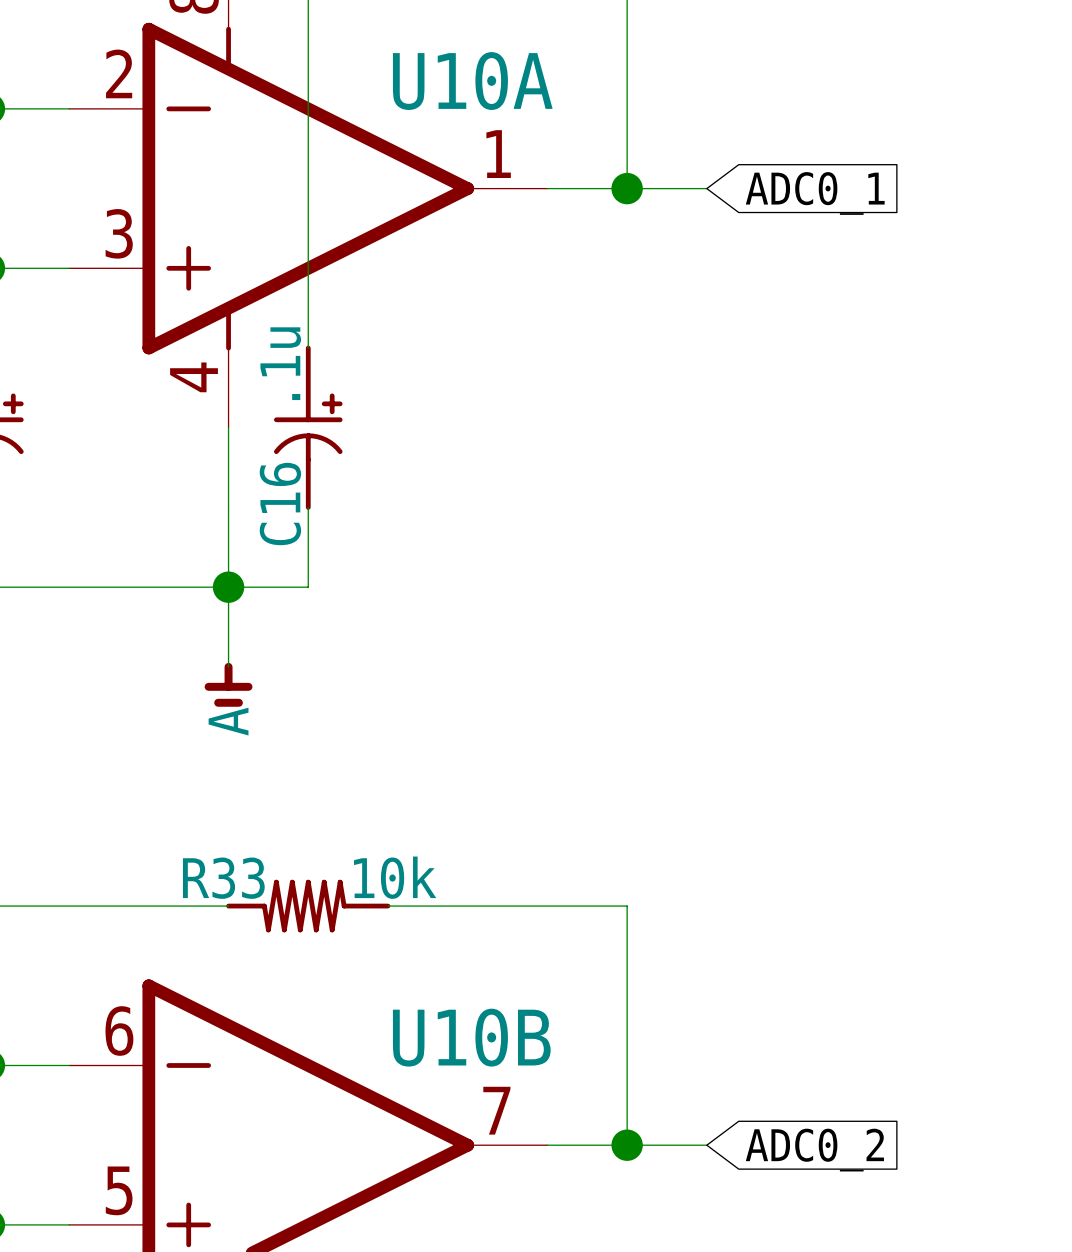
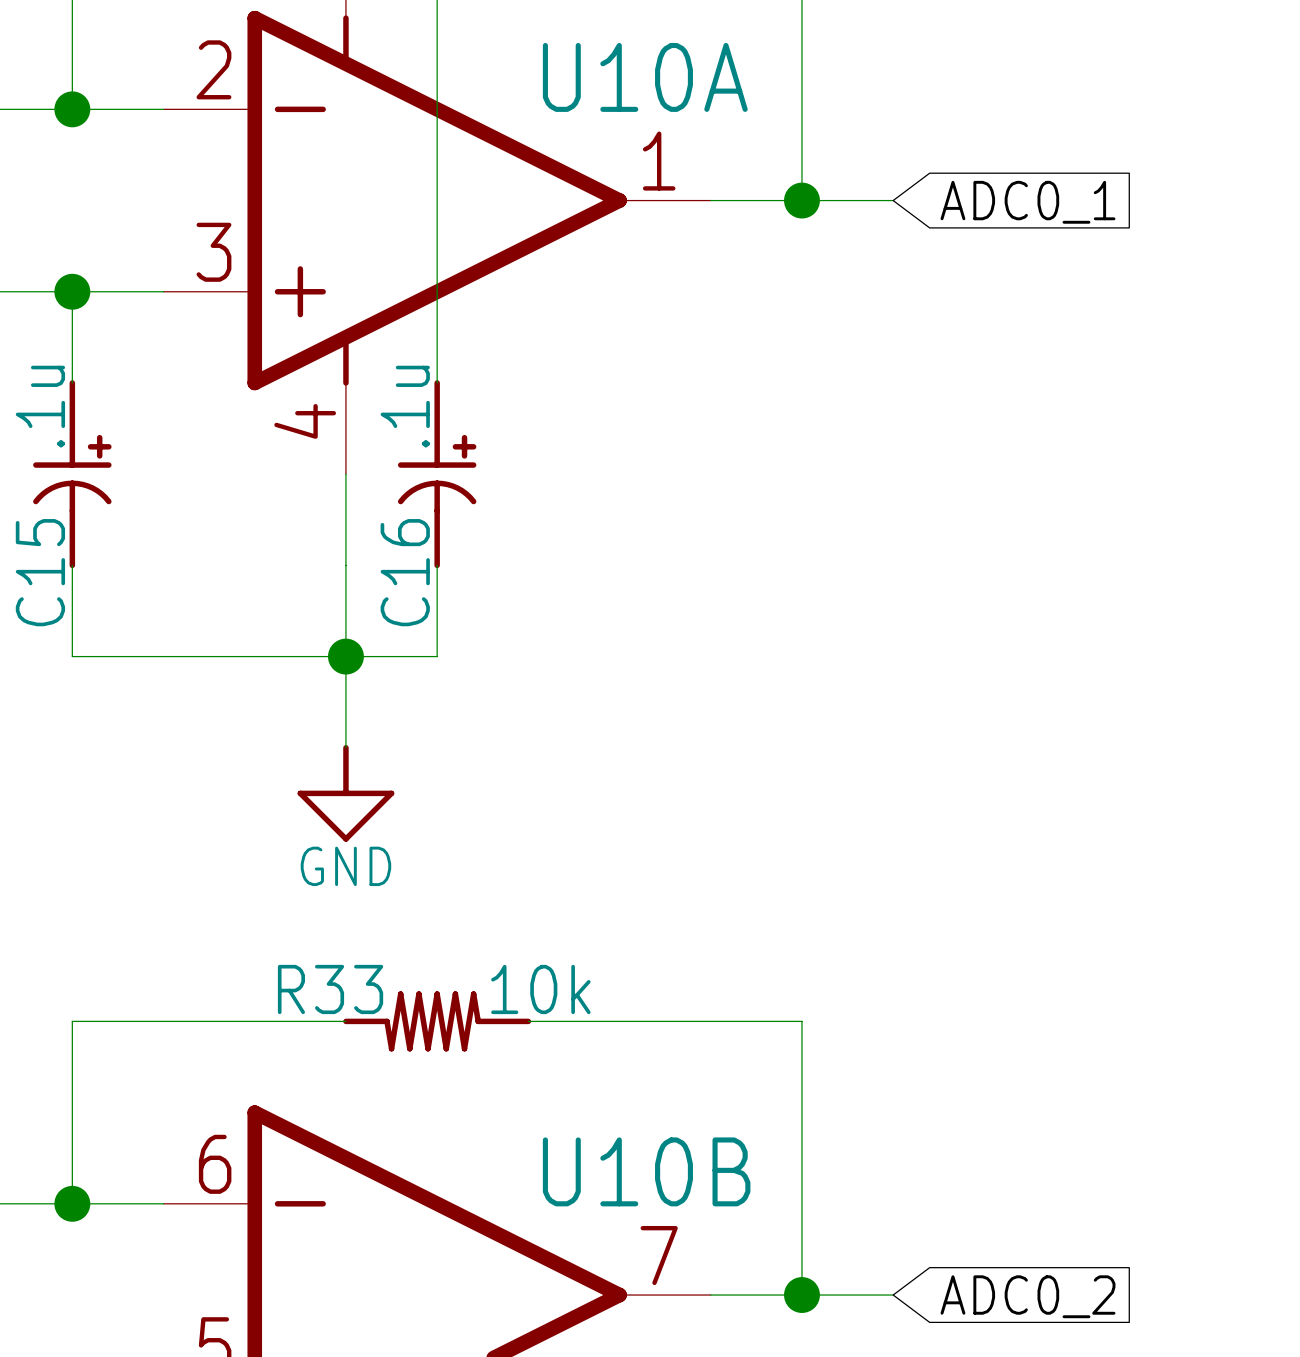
power symbol shape: [204, 662, 253, 707] -> [297, 745, 395, 842]
power symbol text: none -> GND (345, 866)

